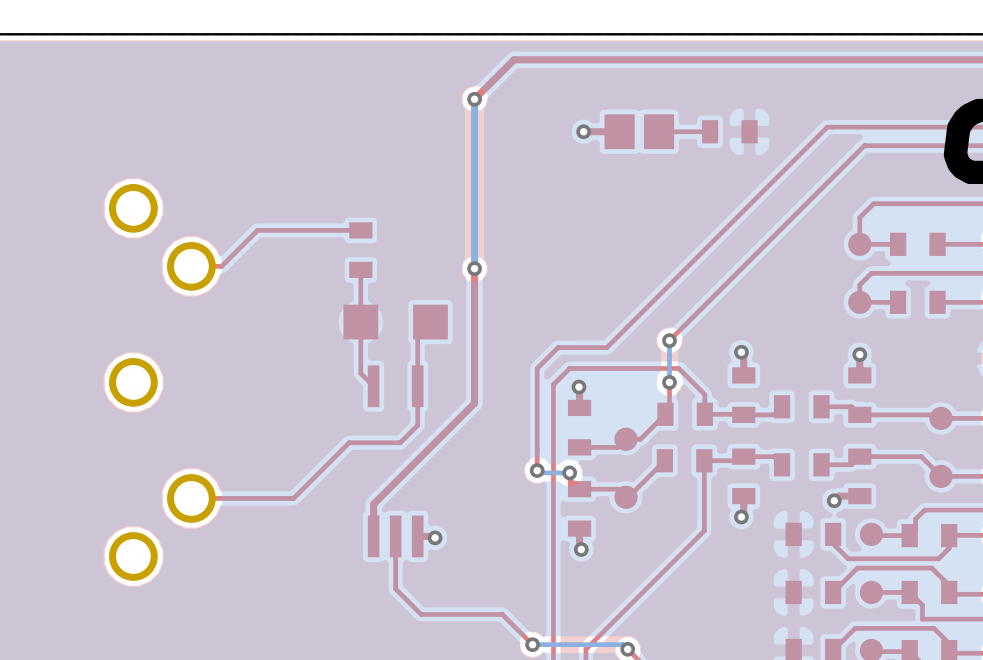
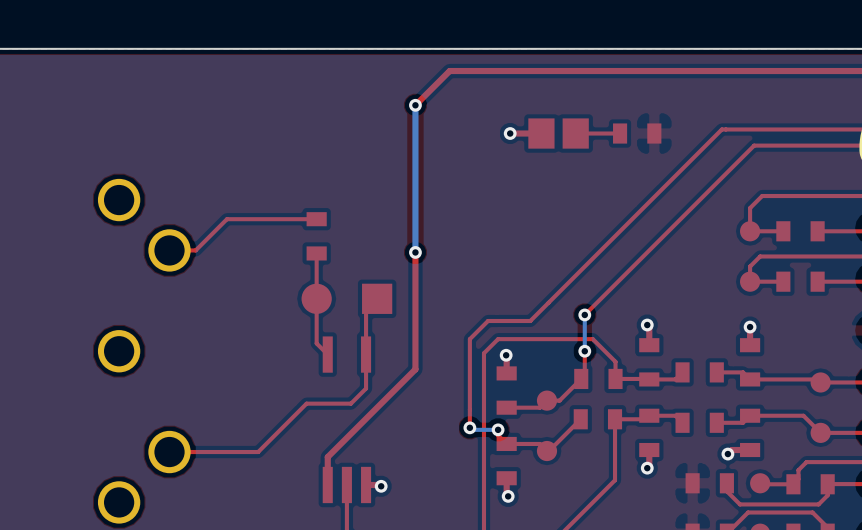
part footprint: [343, 304, 448, 340] -> [301, 283, 393, 314]

